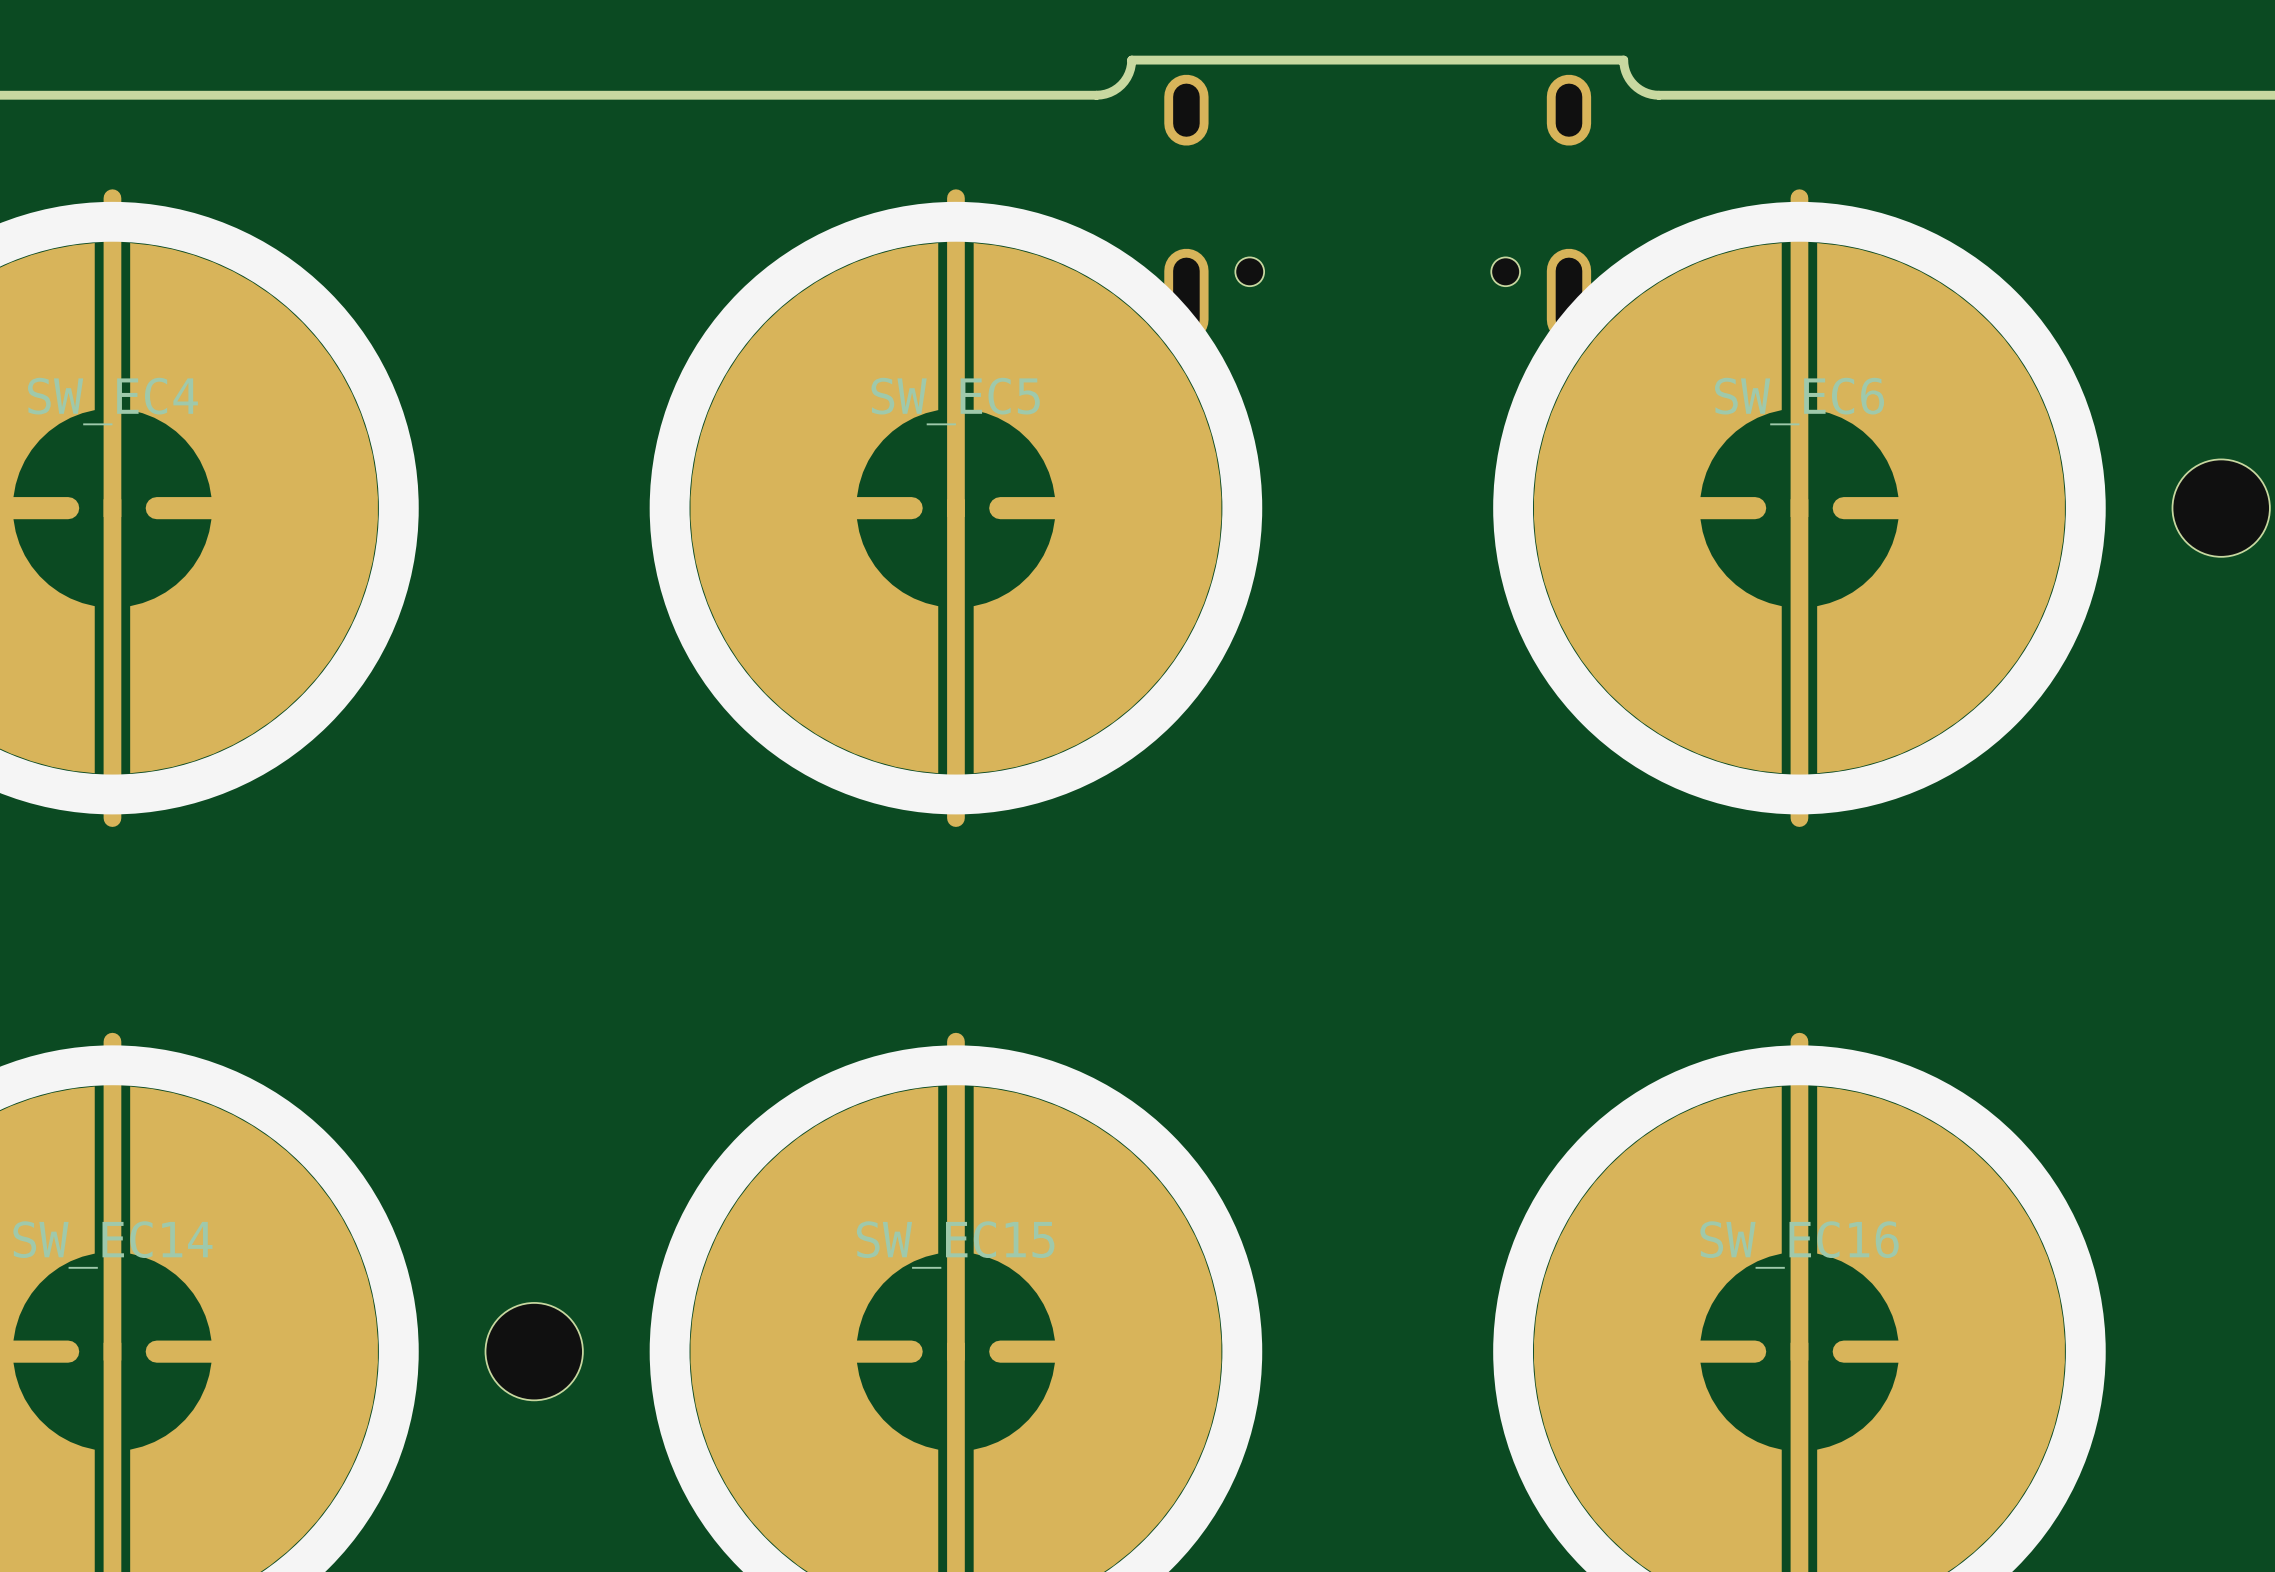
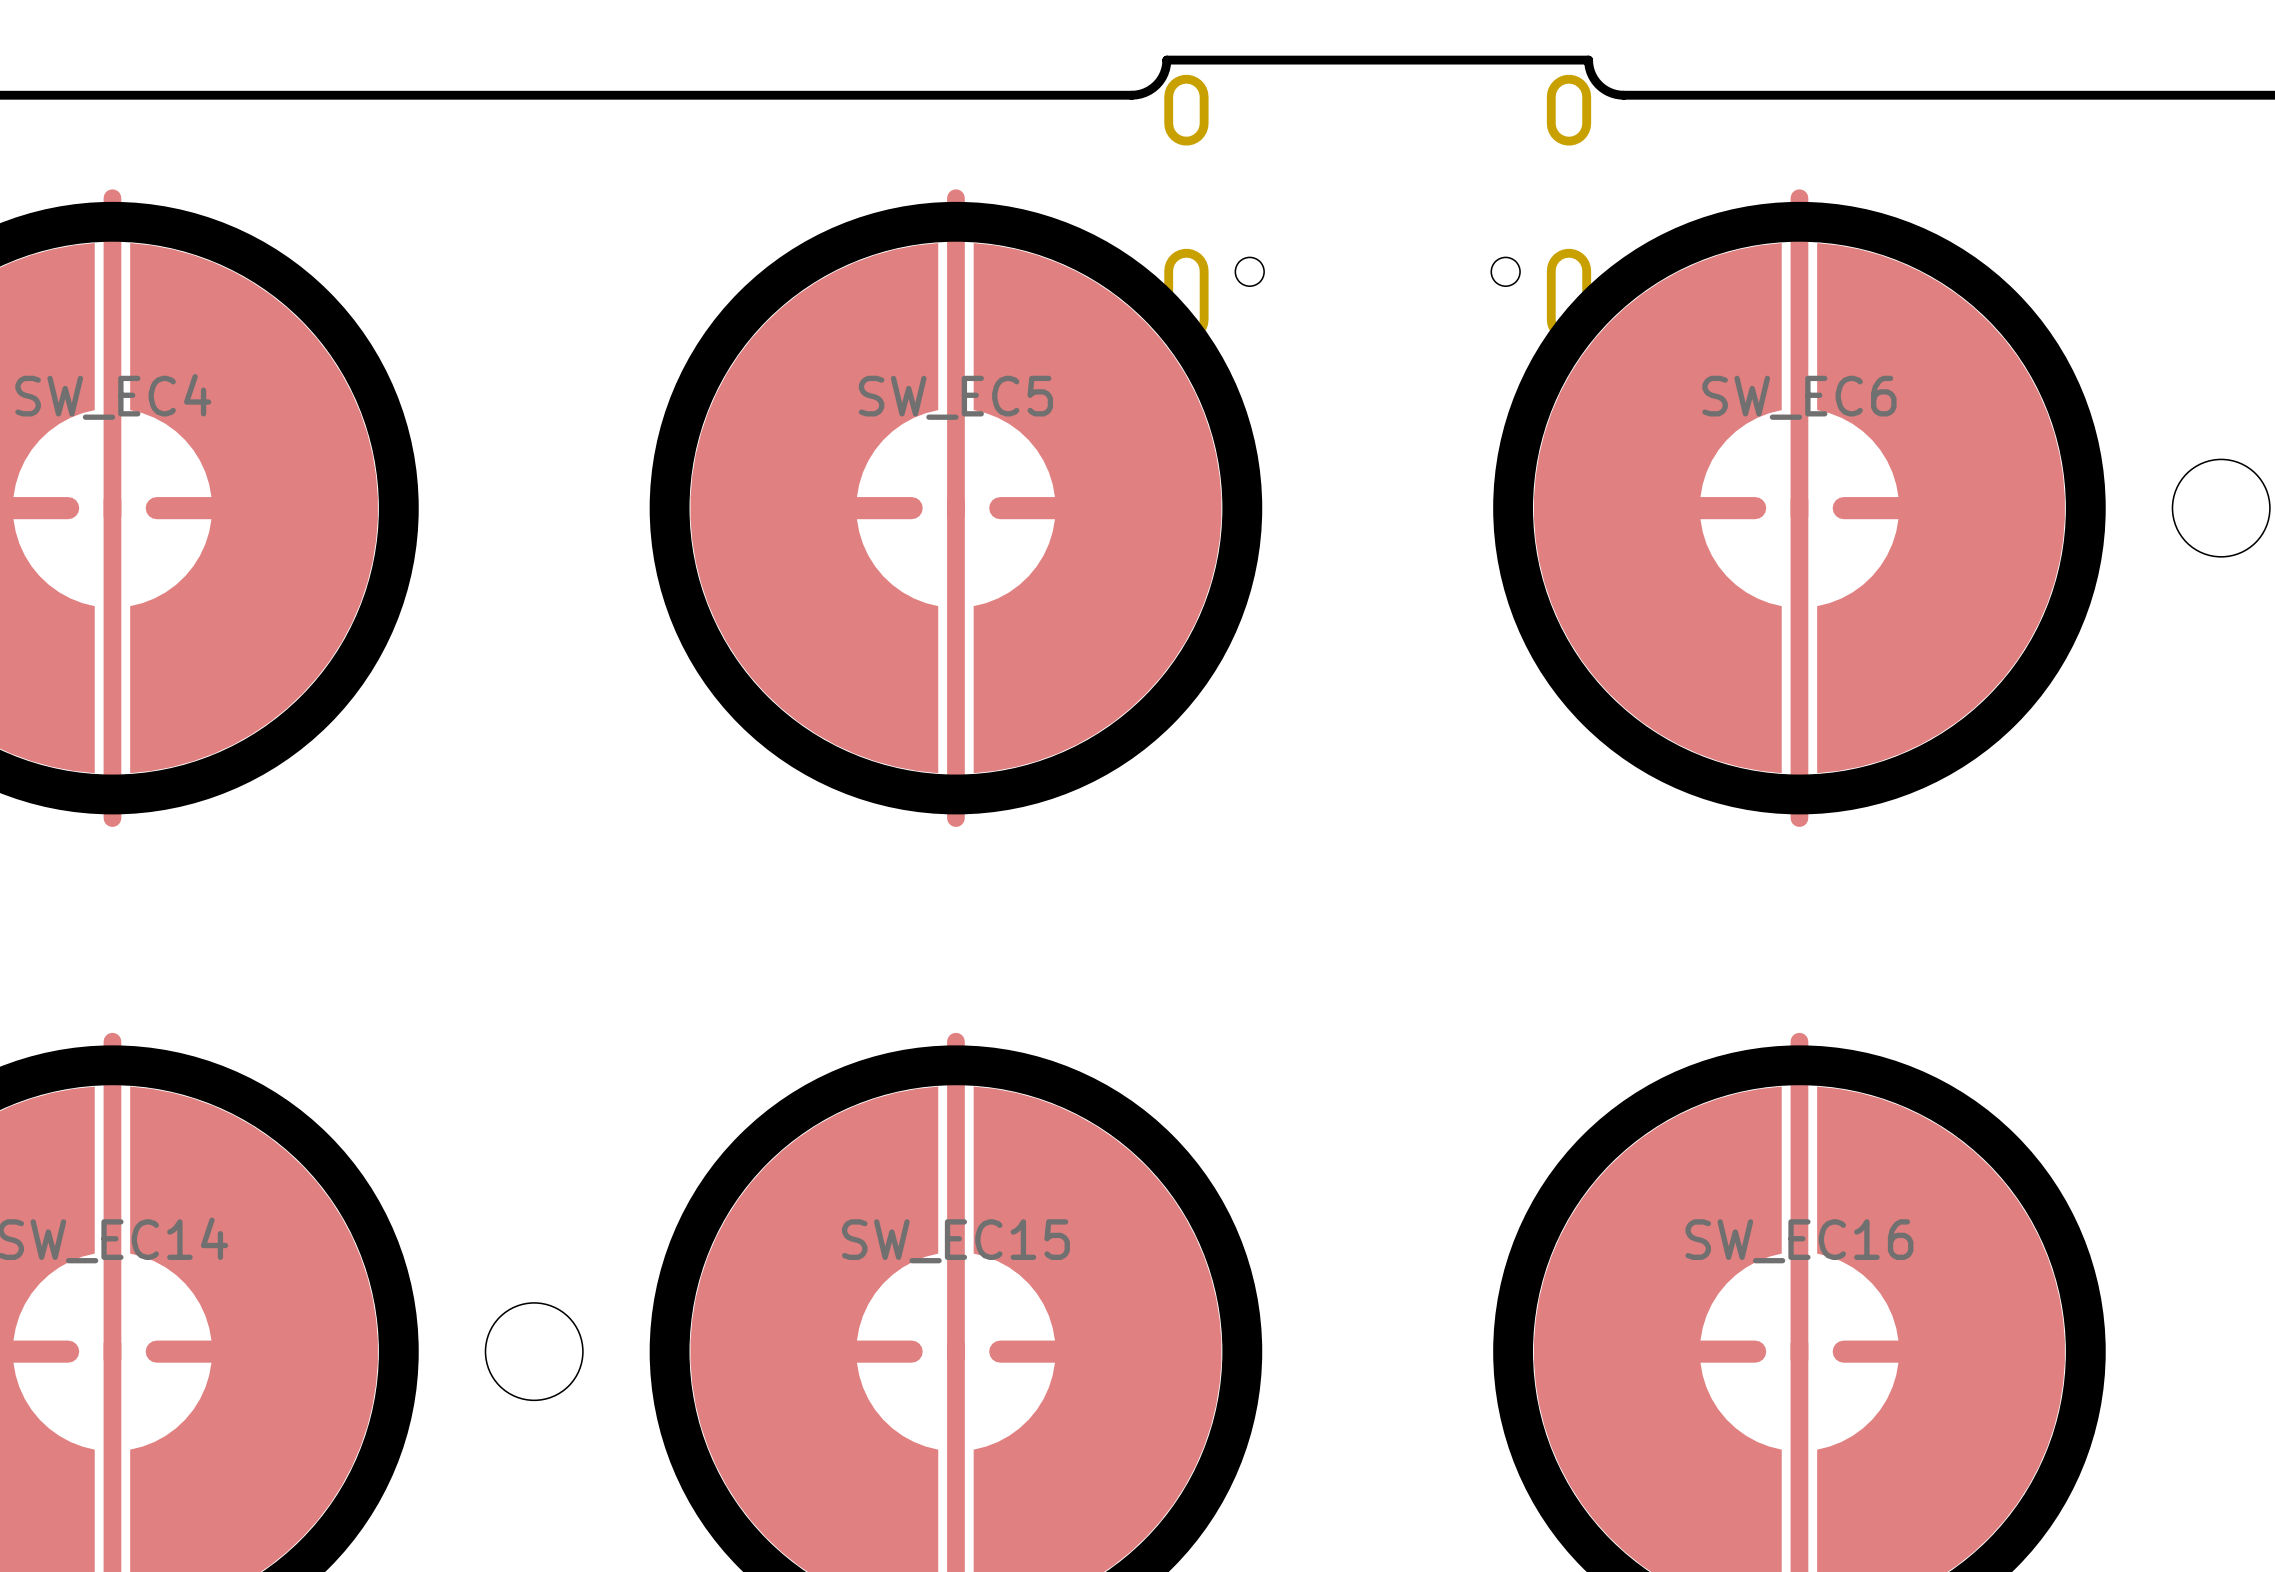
board edge: (1166, 60) (1131, 60) (1129, 73) (1121, 84) (1109, 92) (1096, 95) -> (1166, 60) (1162, 77) (1149, 90) (1136, 94) (1096, 95)
board edge: (1588, 60) (1623, 60) (1625, 71) (1634, 84) (1647, 93) (1658, 95) -> (1588, 60) (1593, 78) (1608, 91) (1619, 95) (1658, 95)

